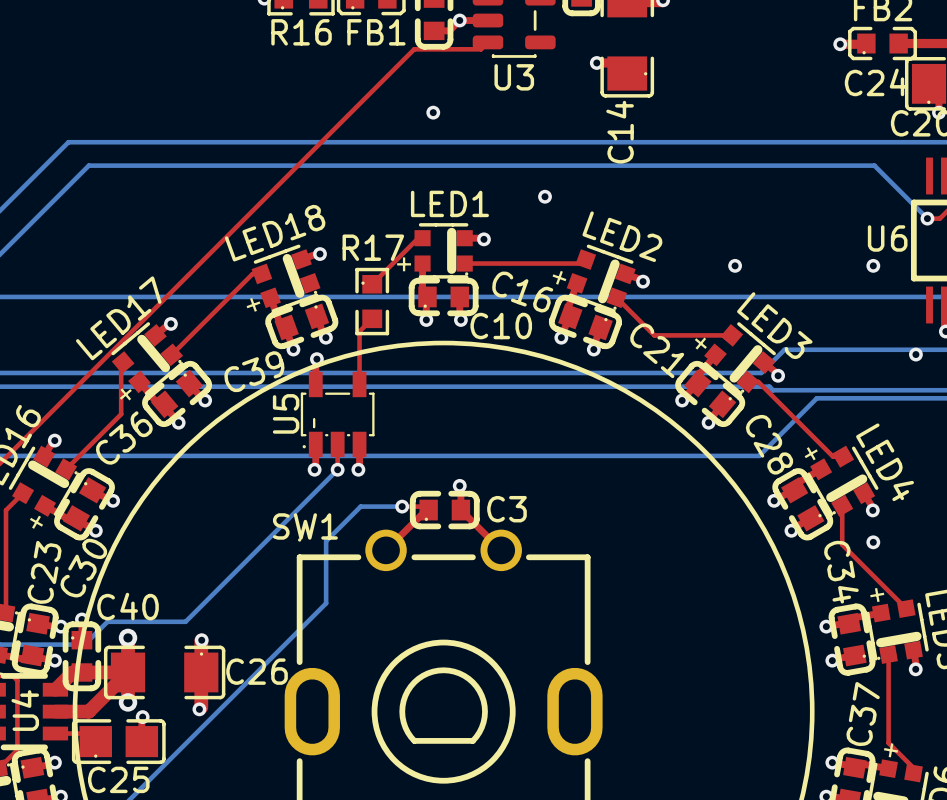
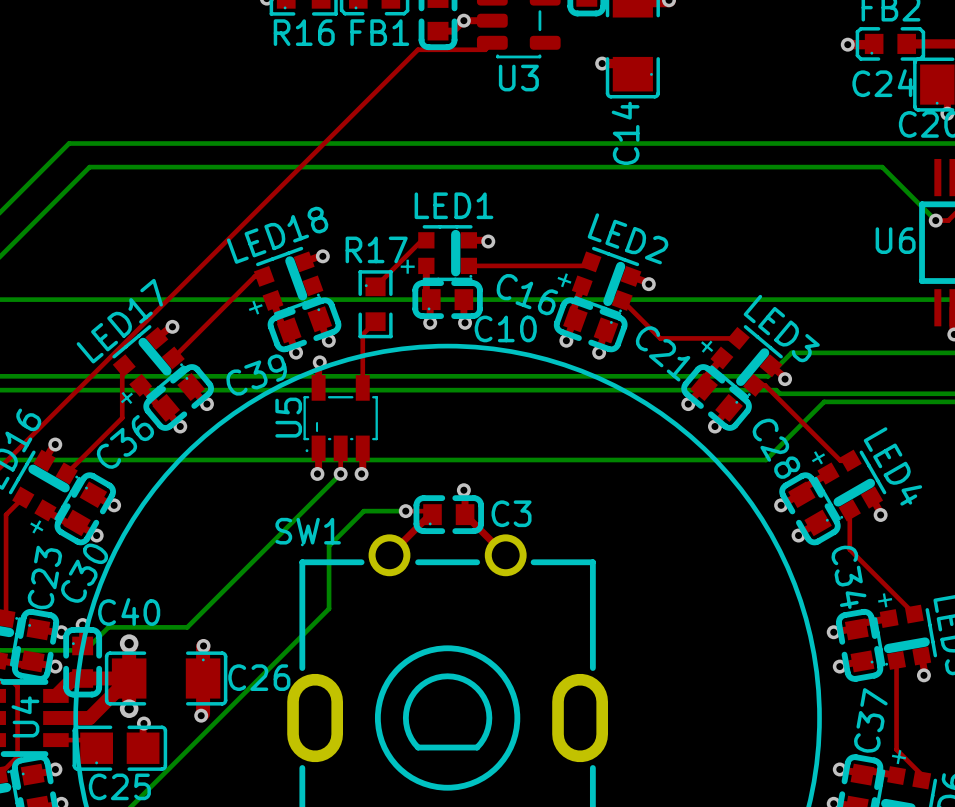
via: (433, 112) -> none
via: (545, 196) -> none
via: (735, 265) -> none
via: (873, 265) -> none
via: (915, 354) -> none
via: (873, 542) -> none

